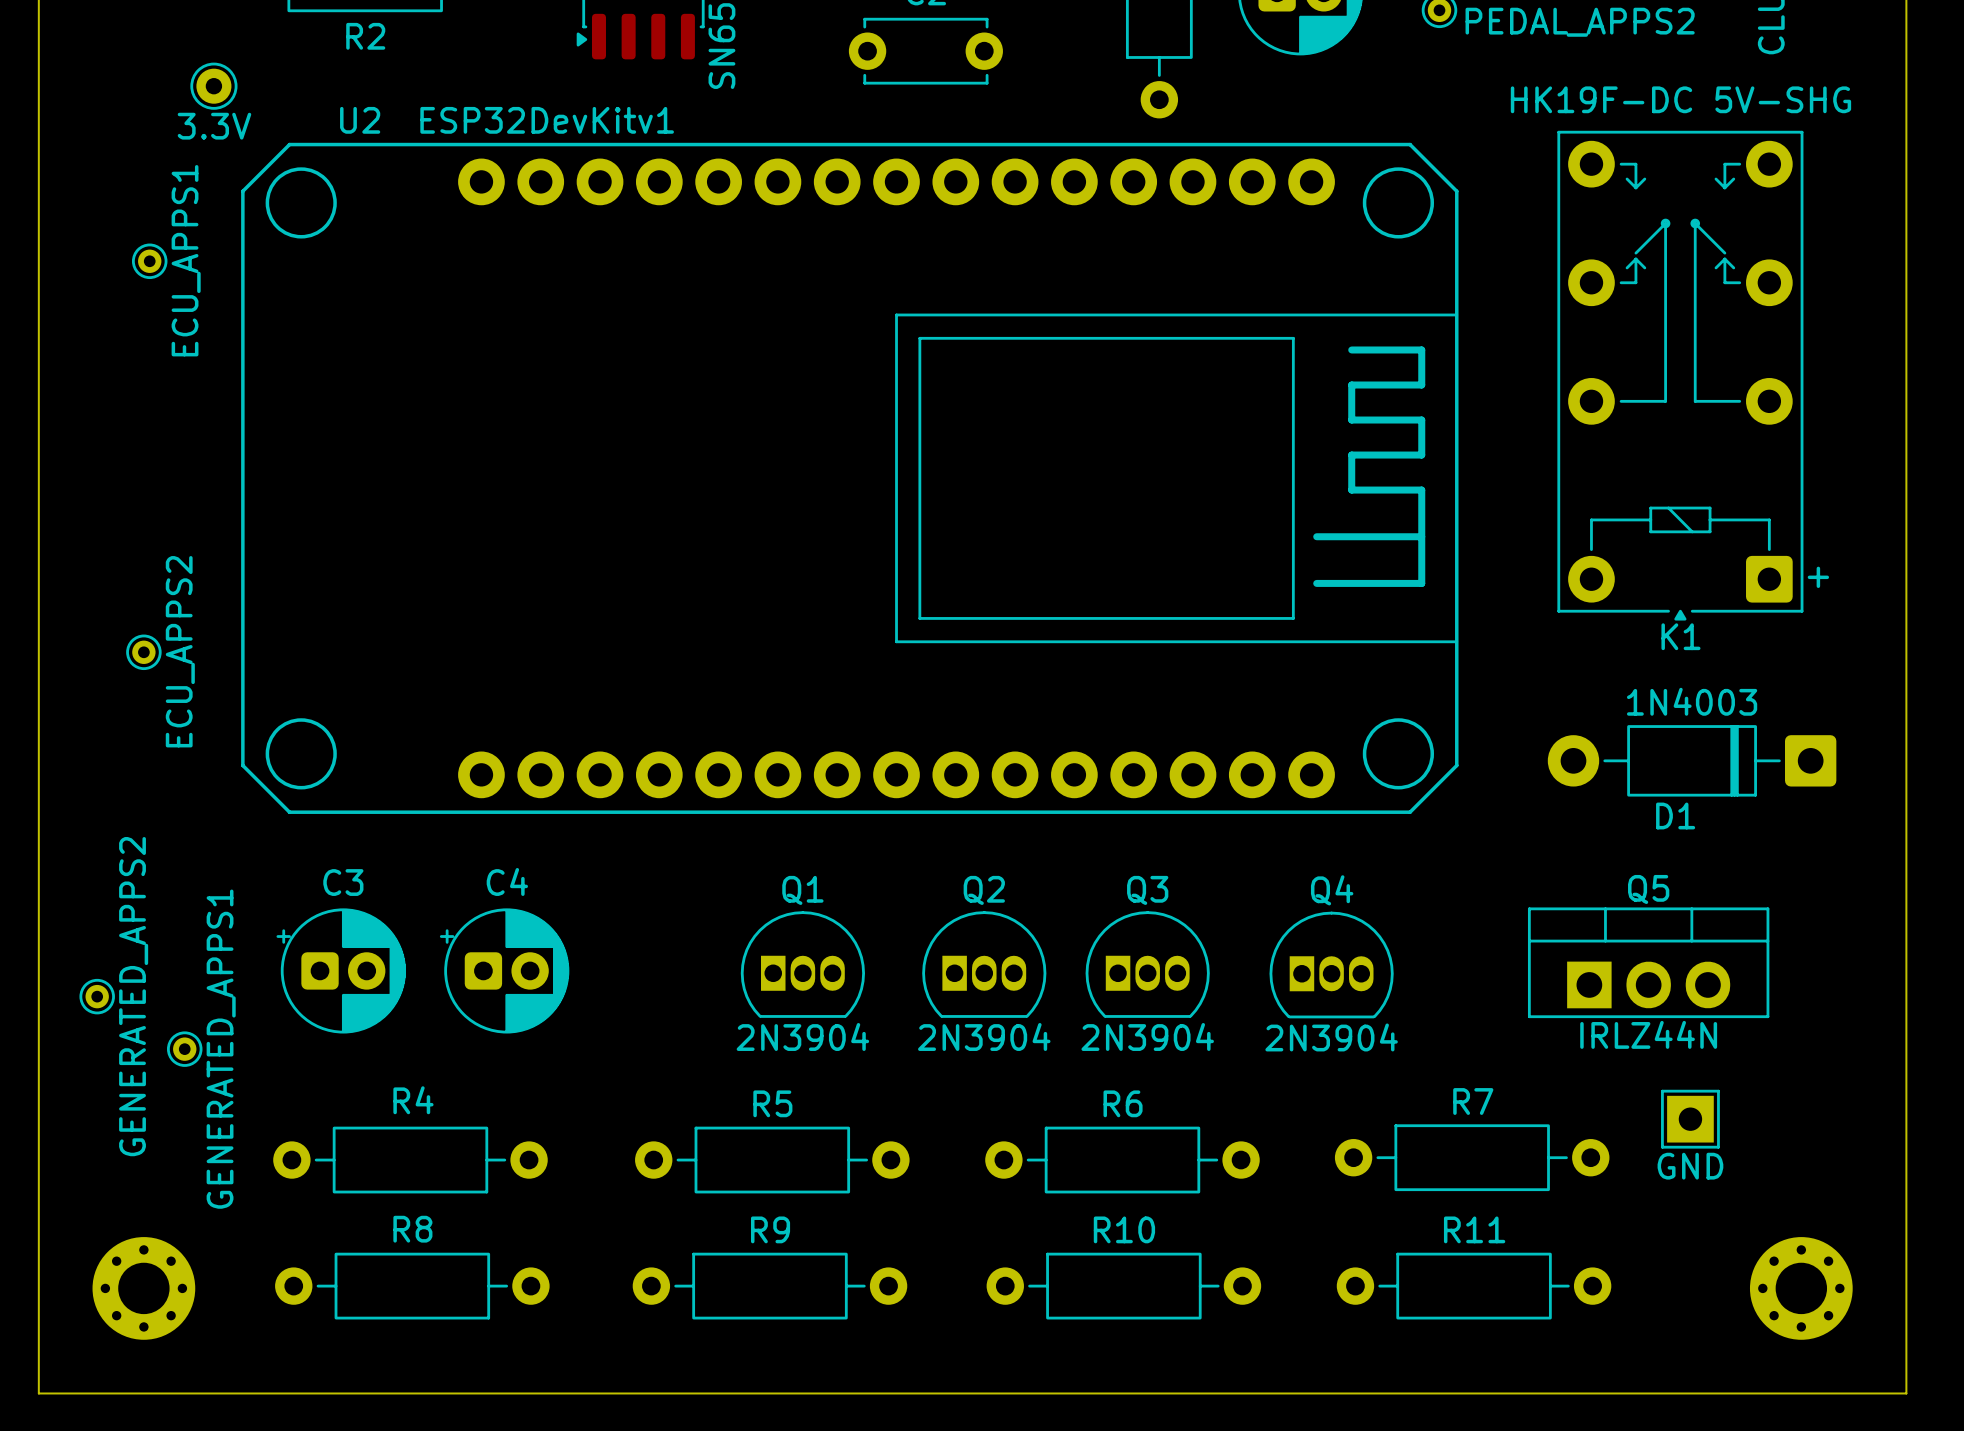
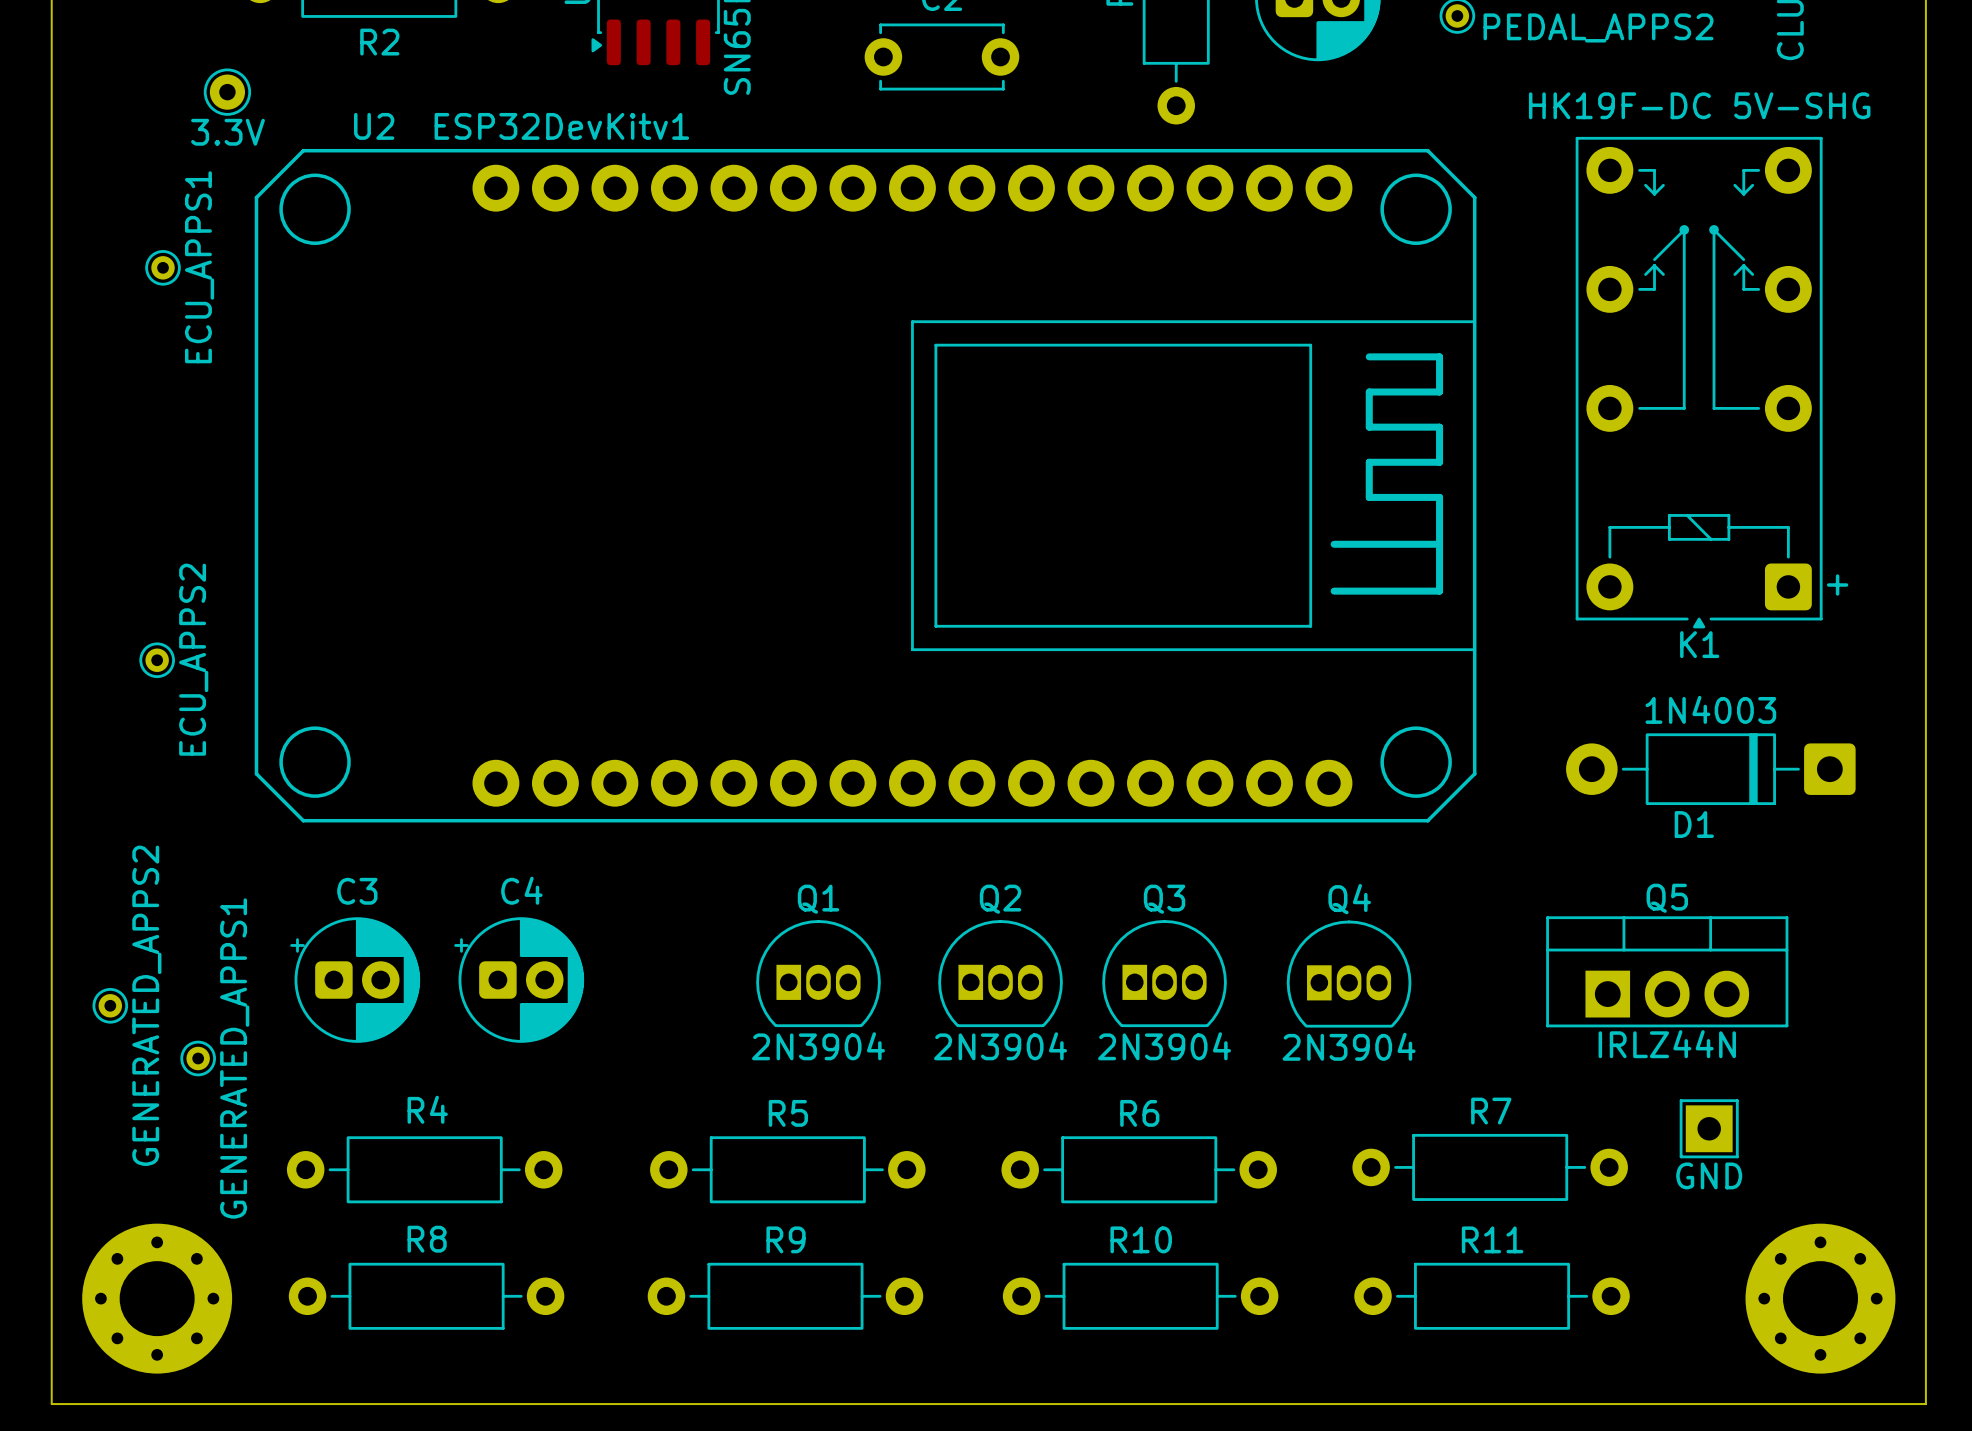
part footprint: [92, 1237, 196, 1340] -> [82, 1223, 233, 1374]
part footprint: [1749, 1237, 1853, 1340] -> [1745, 1223, 1896, 1374]

